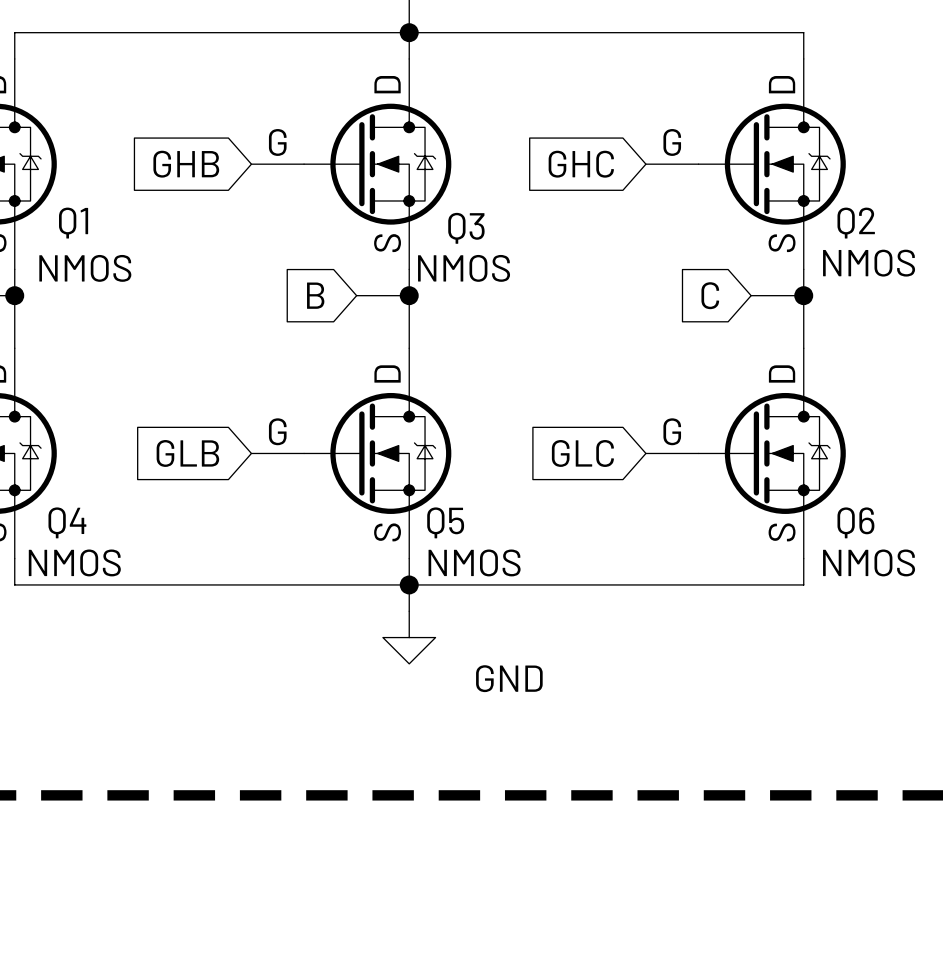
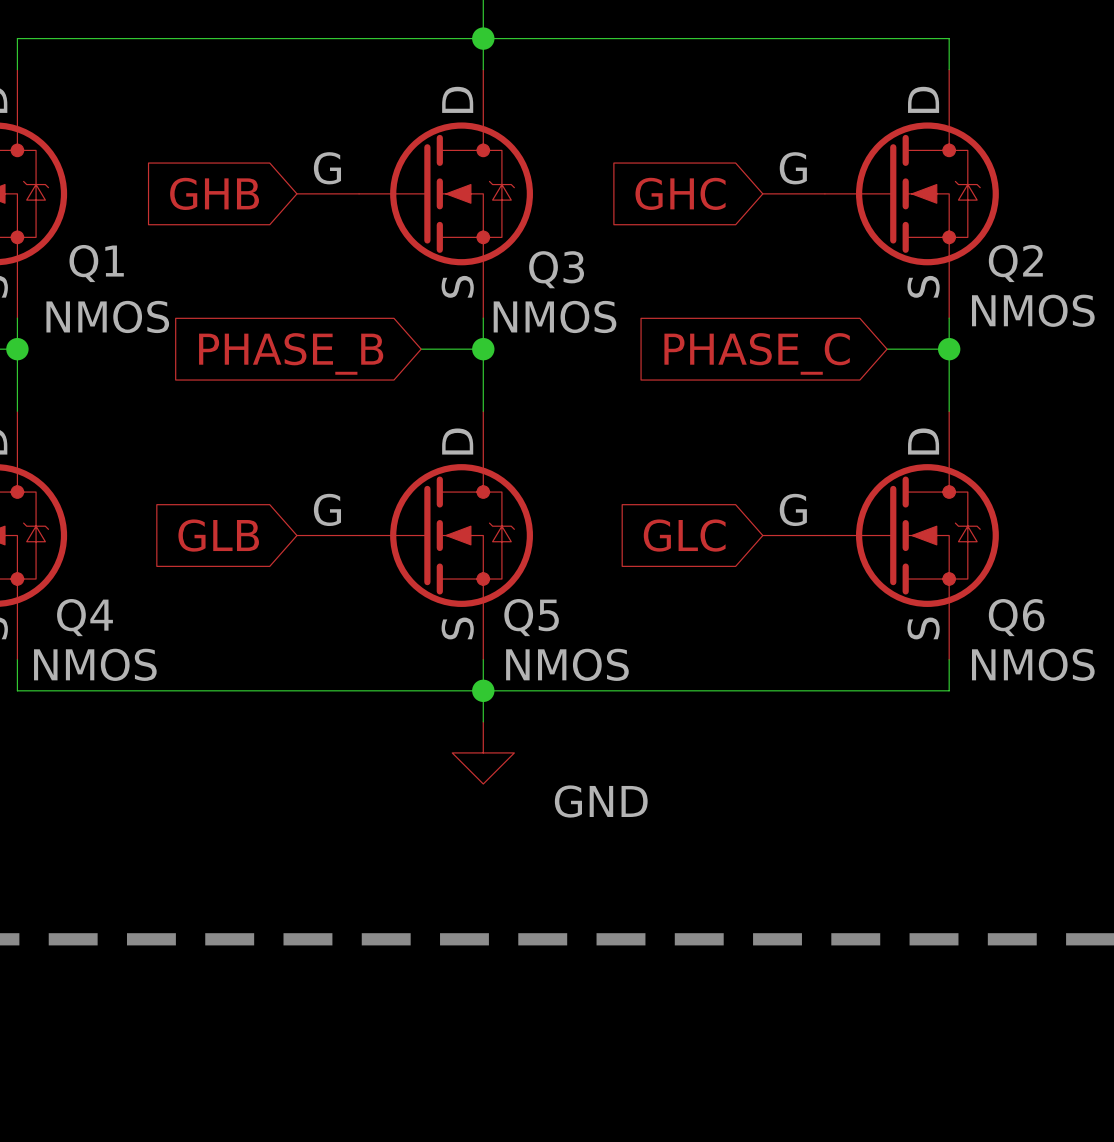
global label: B (315, 295) -> PHASE_B (291, 353)
global label: C (710, 295) -> PHASE_C (757, 353)

